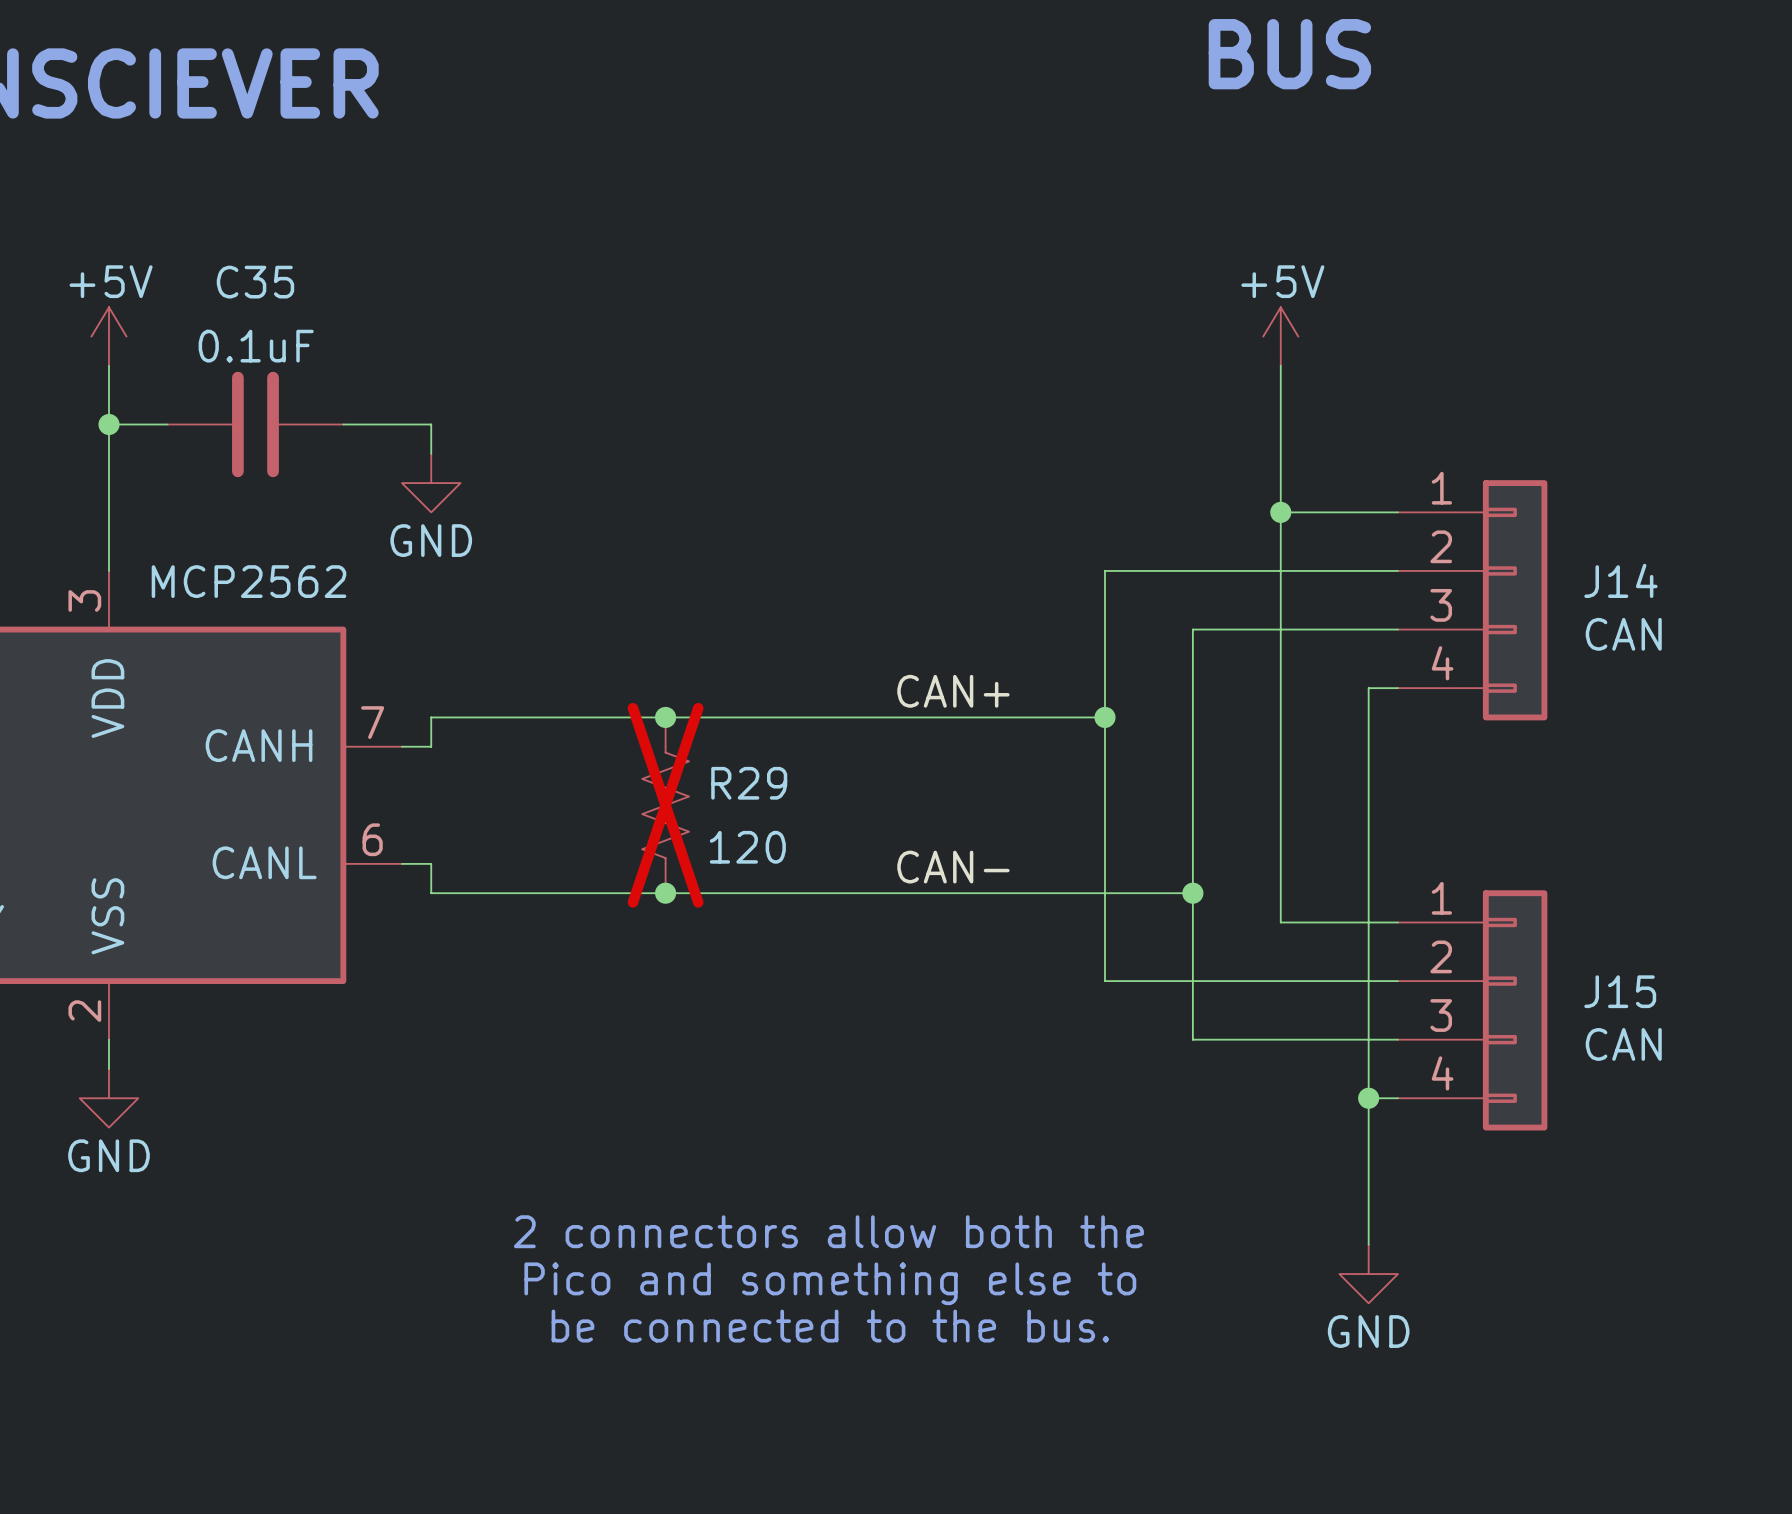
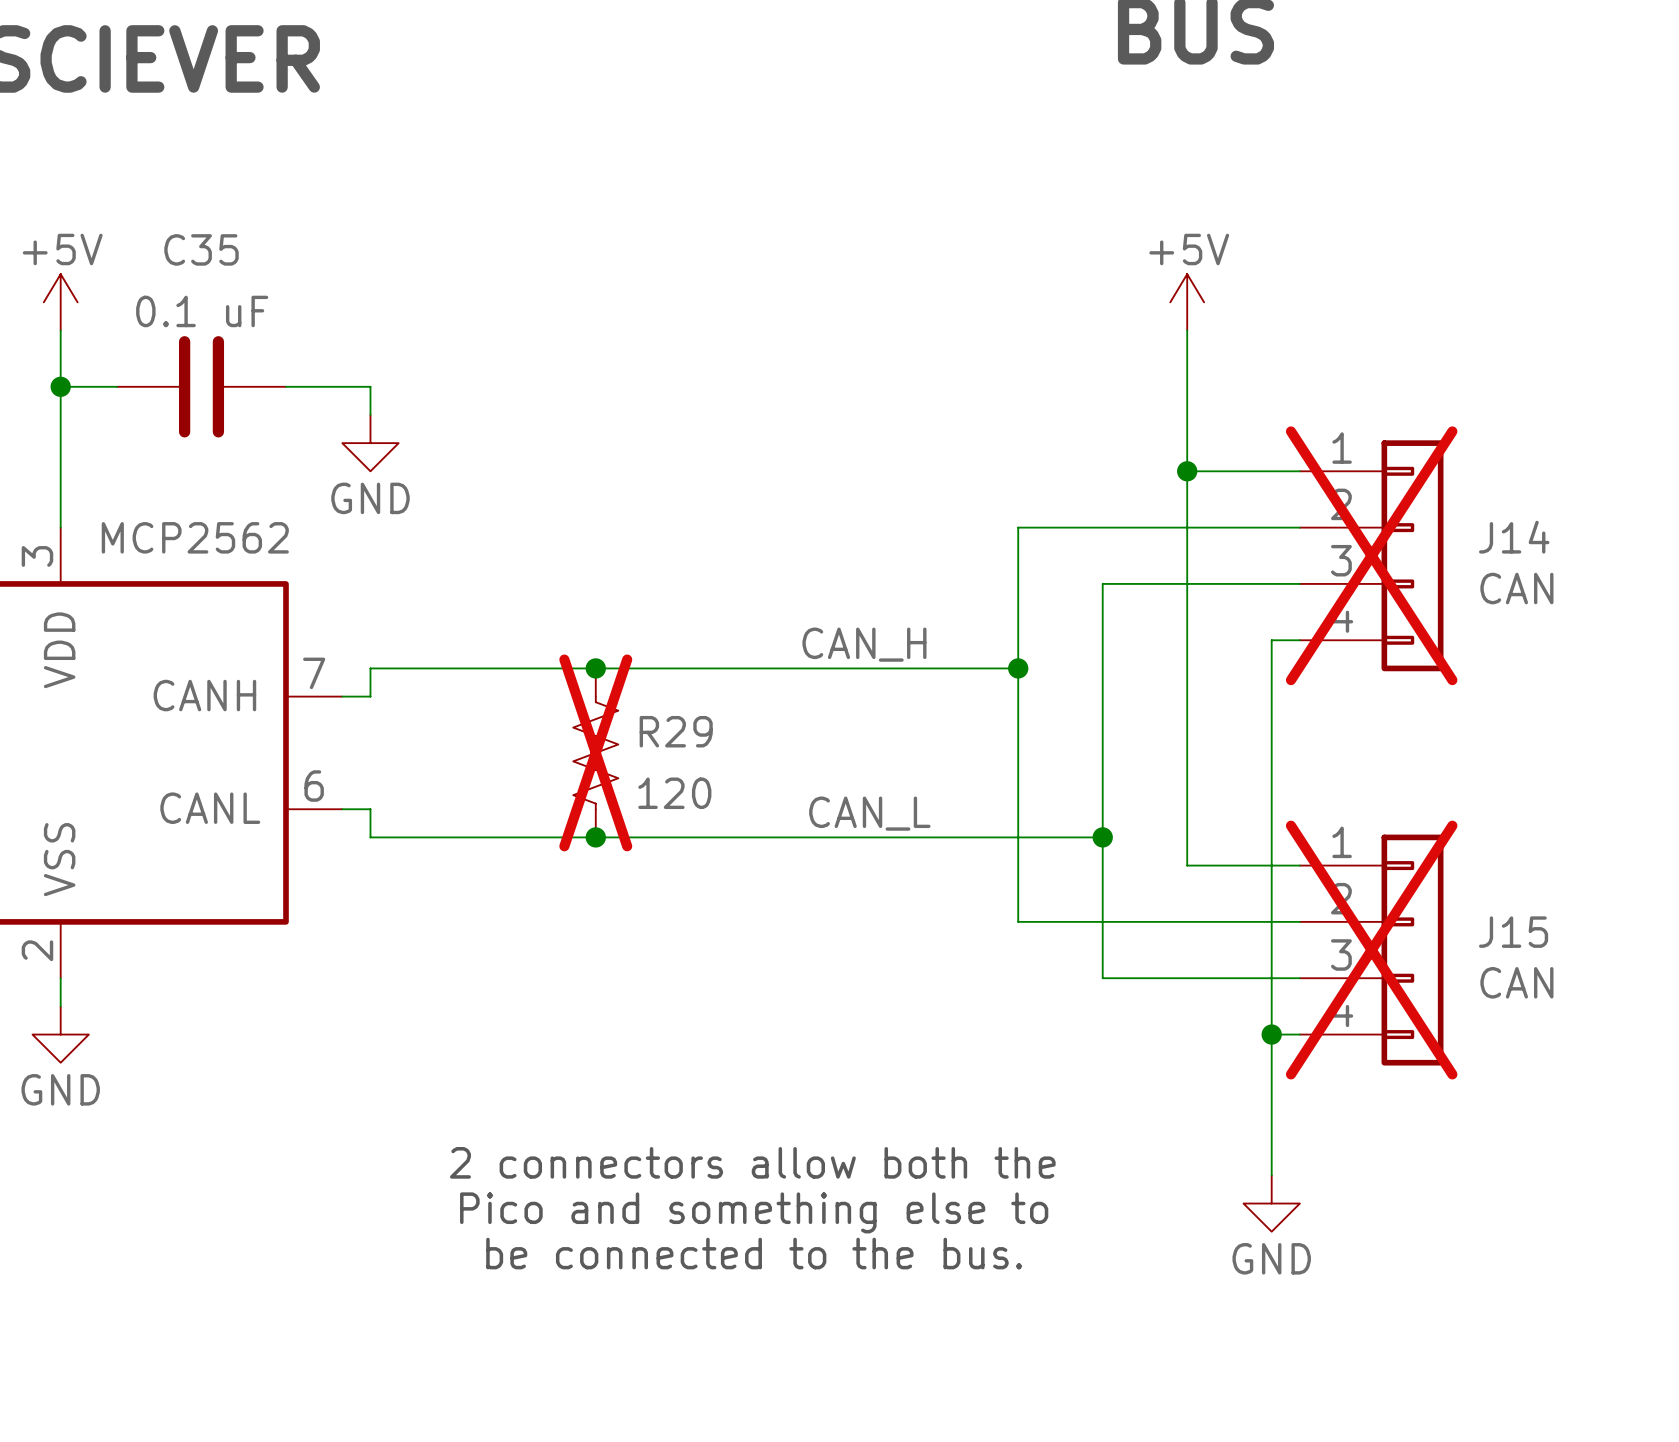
C35 value: 0.1uF (256, 346) -> 0.1 uF (202, 311)
J14 do-not-place cross: none -> (1371, 555)
label: CAN+ (953, 691) -> CAN_H (864, 644)
label: CAN- (953, 867) -> CAN_L (869, 813)
J15 do-not-place cross: none -> (1371, 950)

